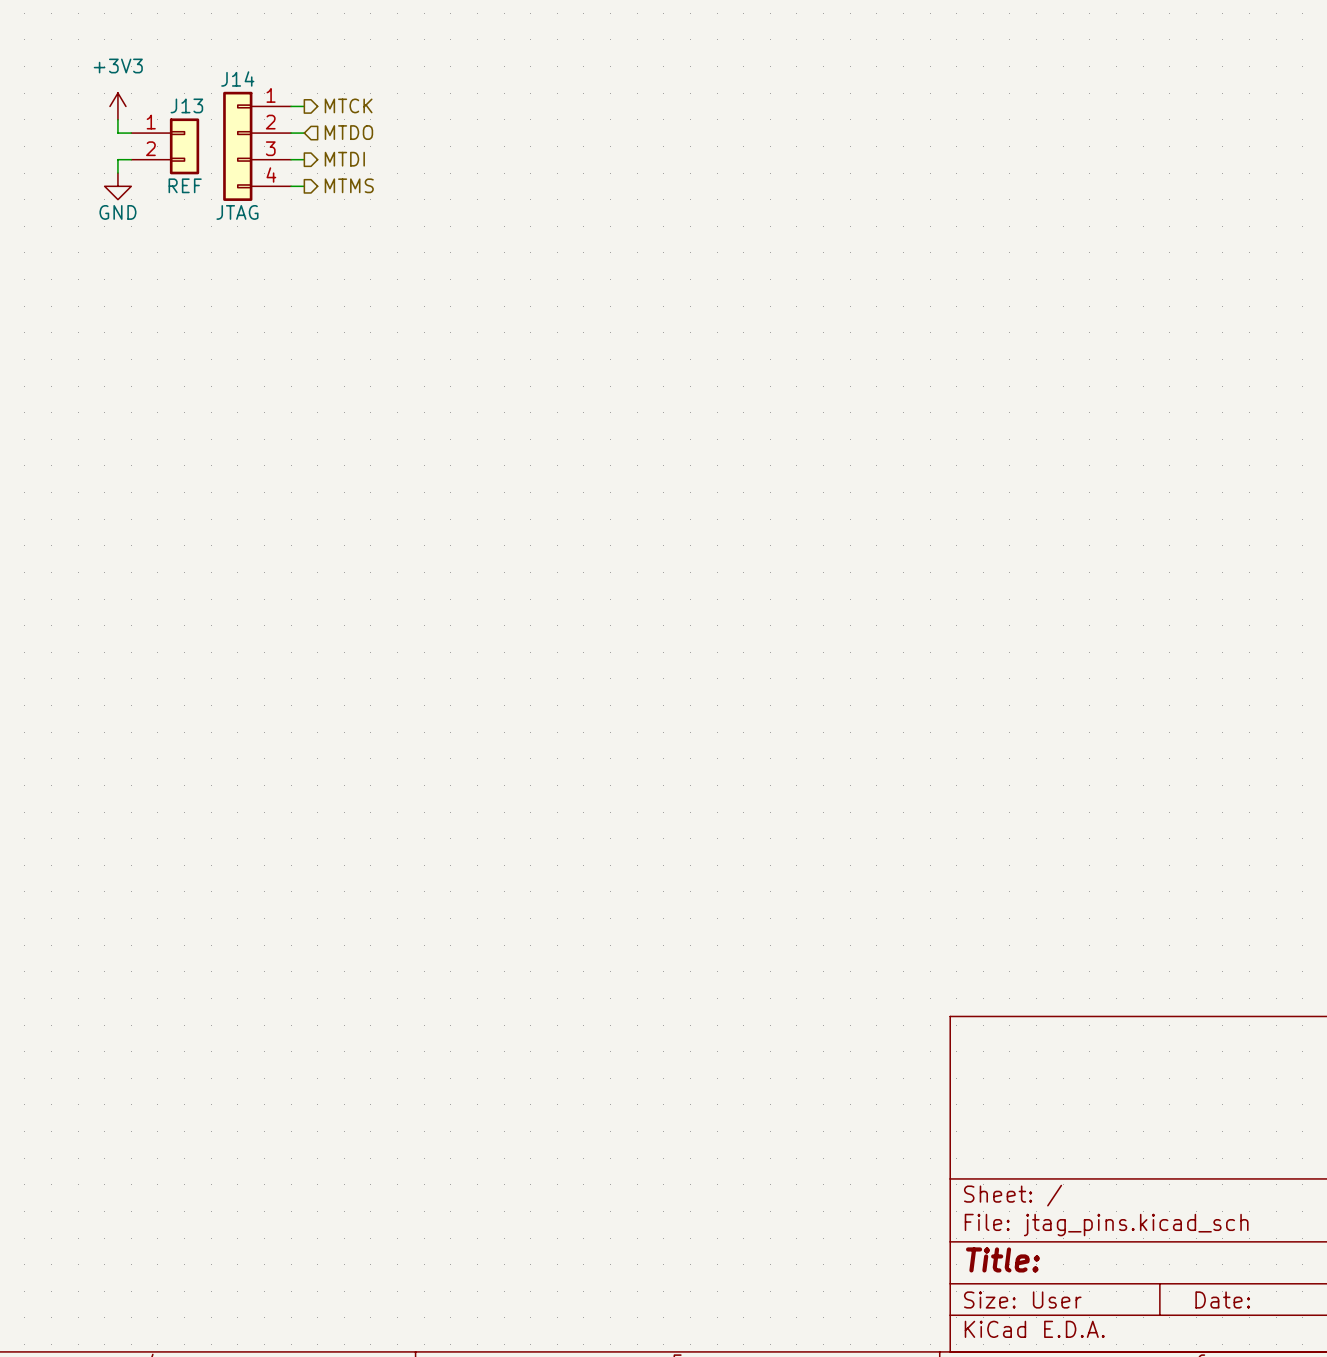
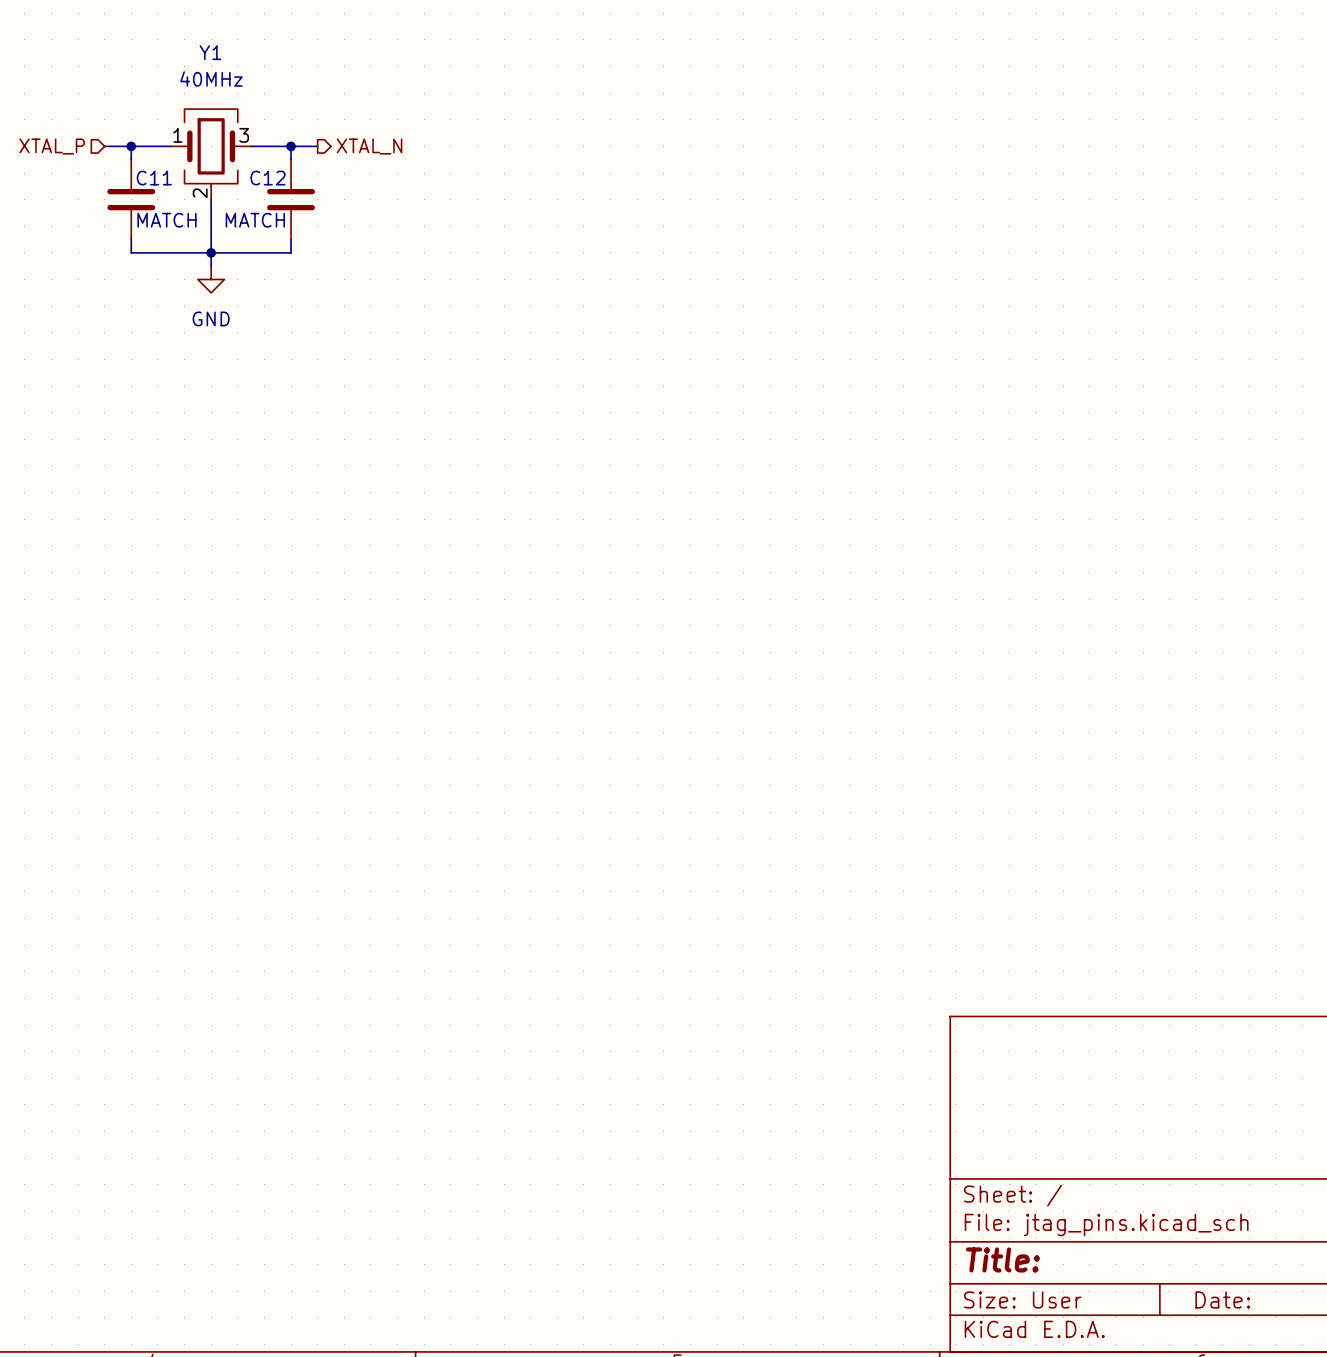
hierarchical label: MTCK (348, 105) -> none
power symbol: +3V3 (117, 106) -> none
wire: (291, 106) (304, 106) -> none
wire: (117, 119) (117, 133) (131, 133) -> none
hierarchical label: MTDO (348, 132) -> none
wire: (291, 133) (304, 133) -> none
hierarchical label: none -> XTAL_P (52, 146)
wire: none -> (104, 146) (171, 146)
junction: none -> (131, 146)
J13: REF (165, 146) -> none
wire: none -> (251, 146) (317, 146)
J14: JTAG (257, 146) -> none
junction: none -> (291, 146)
hierarchical label: none -> XTAL_N (369, 146)
Y1: none -> 40MHz (211, 154)
wire: (131, 159) (117, 159) (117, 173) -> (131, 159) (131, 146)
wire: (291, 159) (304, 159) -> (291, 159) (291, 146)
hierarchical label: MTDI (344, 159) -> none
hierarchical label: MTMS (349, 185) -> none
power symbol position: GND (117, 186) -> GND (211, 279)
wire: (291, 186) (304, 186) -> none
C11: none -> MATCH (131, 199)
wire: none -> (211, 199) (211, 266)
C12: none -> MATCH (291, 199)
power symbol text position: GND (117, 212) -> GND (211, 318)
wire: none -> (131, 239) (131, 252) (291, 252) (291, 239)
junction: none -> (211, 252)

